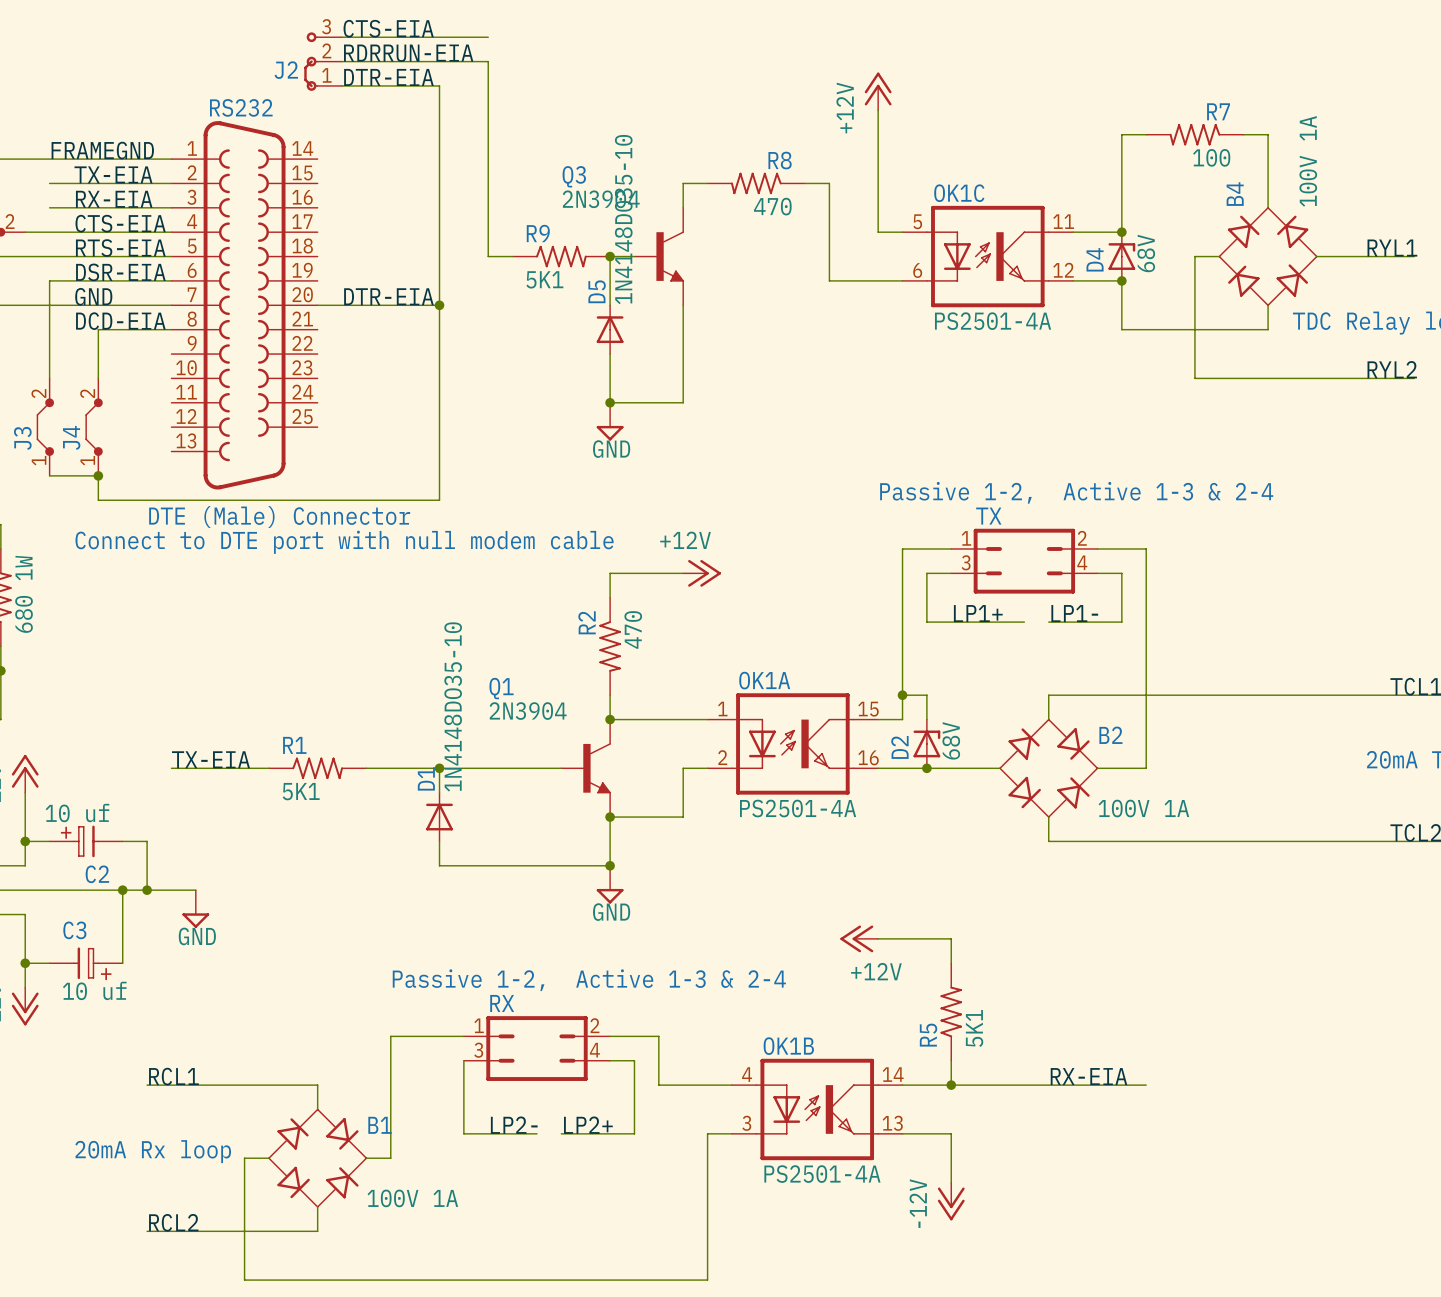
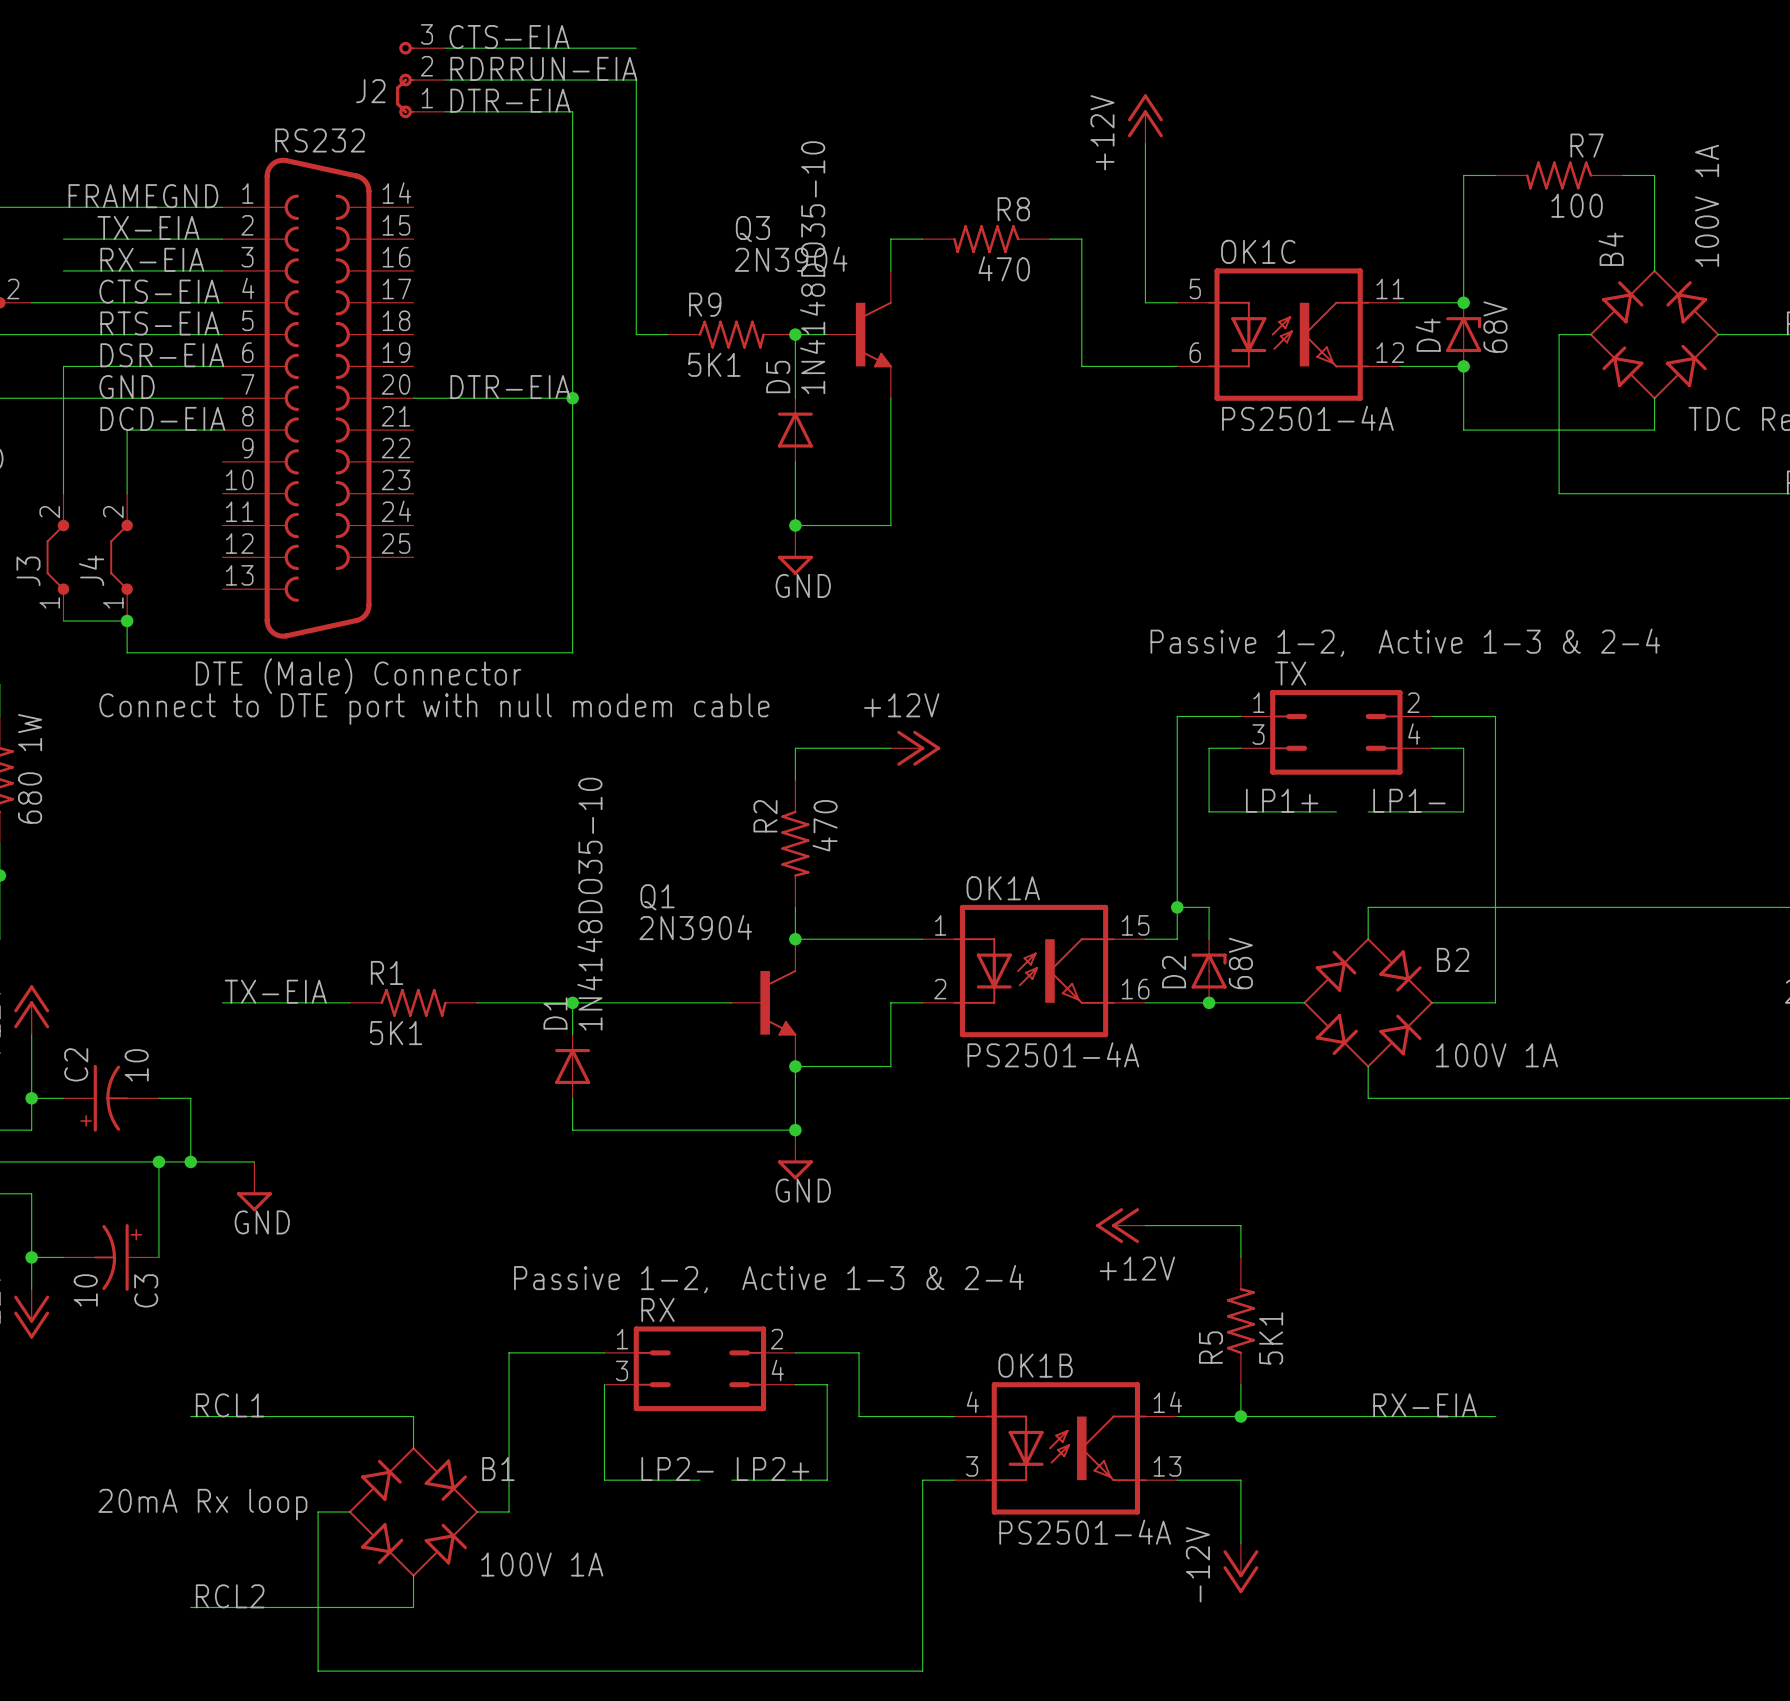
C2 value: 10 uf (77, 813) -> 10 (136, 1065)
C2 symbol: [49, 825, 123, 858] -> [63, 1064, 159, 1132]
C2 name position: C2 (97, 874) -> C2 (76, 1064)
C3 name position: C3 (74, 930) -> C3 (146, 1290)
C3 symbol: [49, 947, 123, 980] -> [63, 1224, 159, 1291]
C3 value: 10 uf (94, 990) -> 10 (85, 1290)

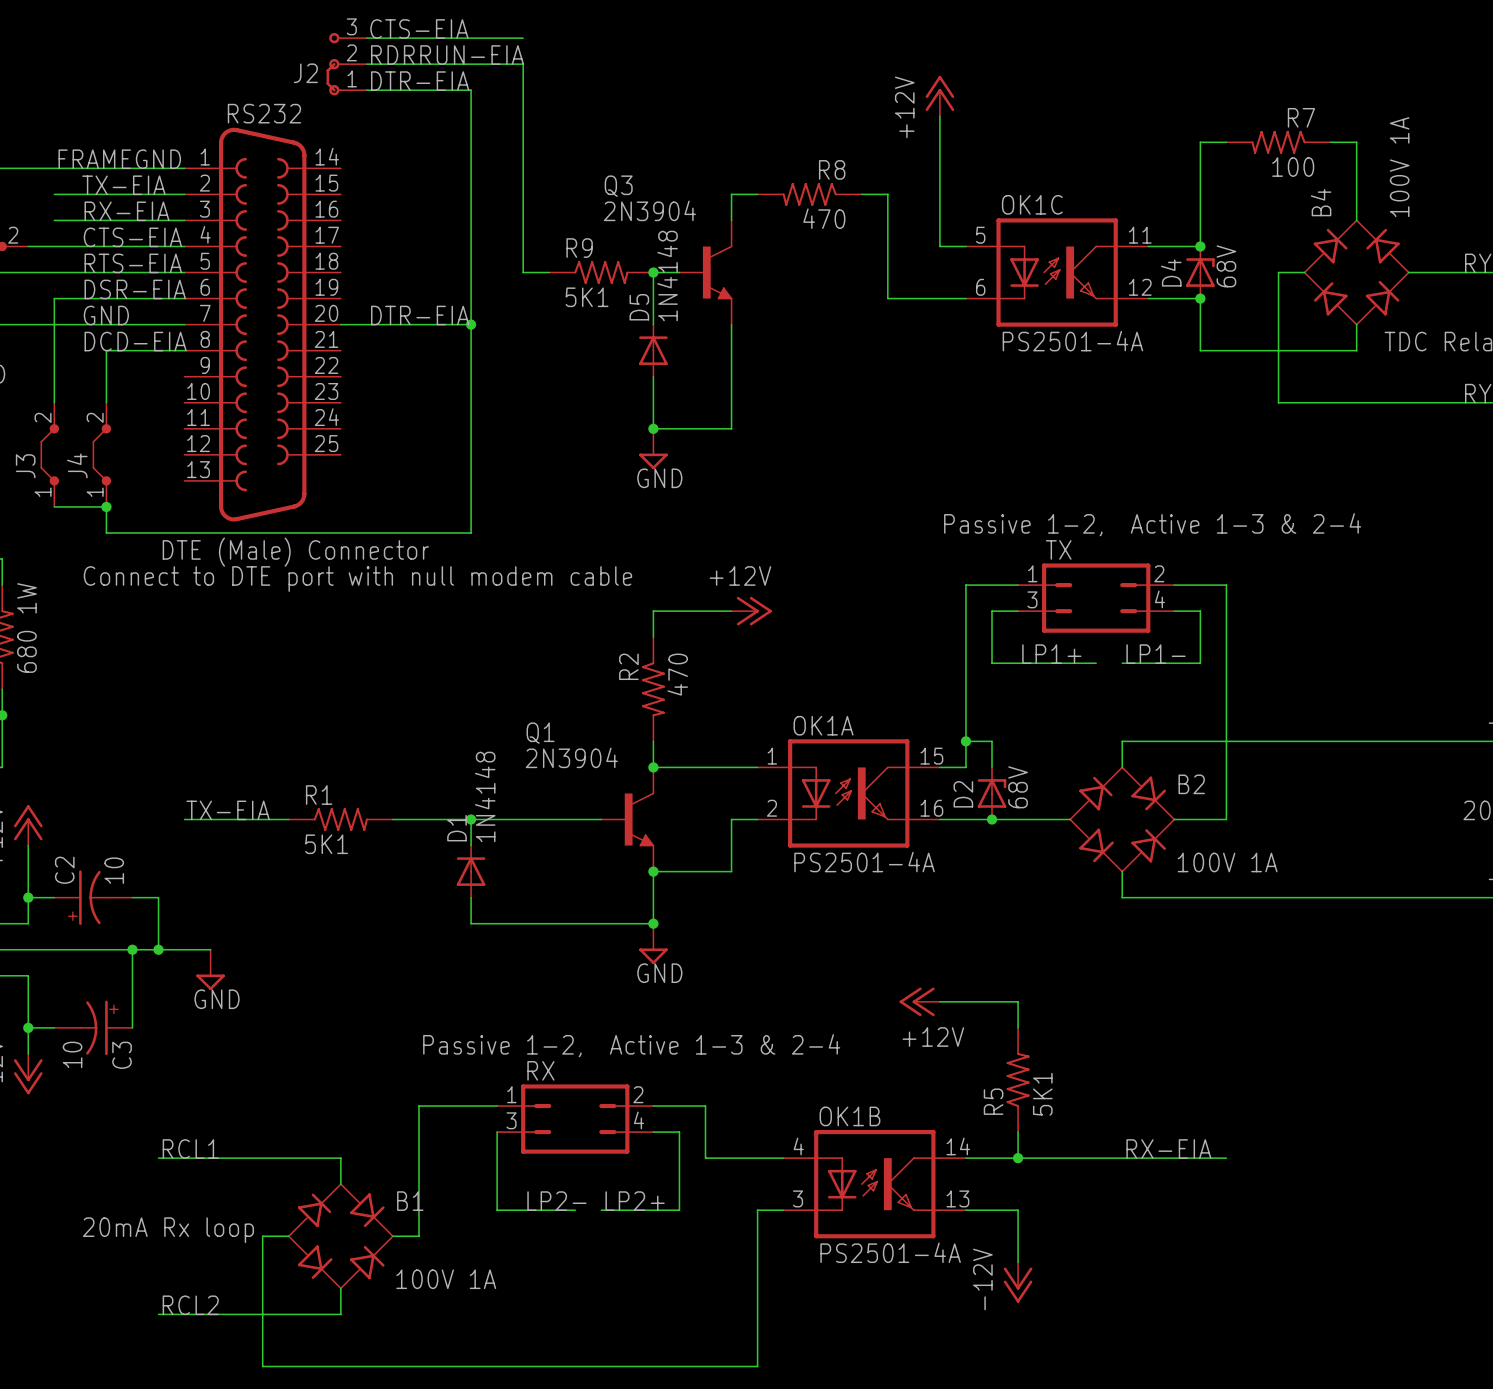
D5 value: 1N4148DO35-10 (812, 267) -> 1N4148 (667, 276)
D1 value: 1N4148DO35-10 (589, 904) -> 1N4148 (485, 796)

